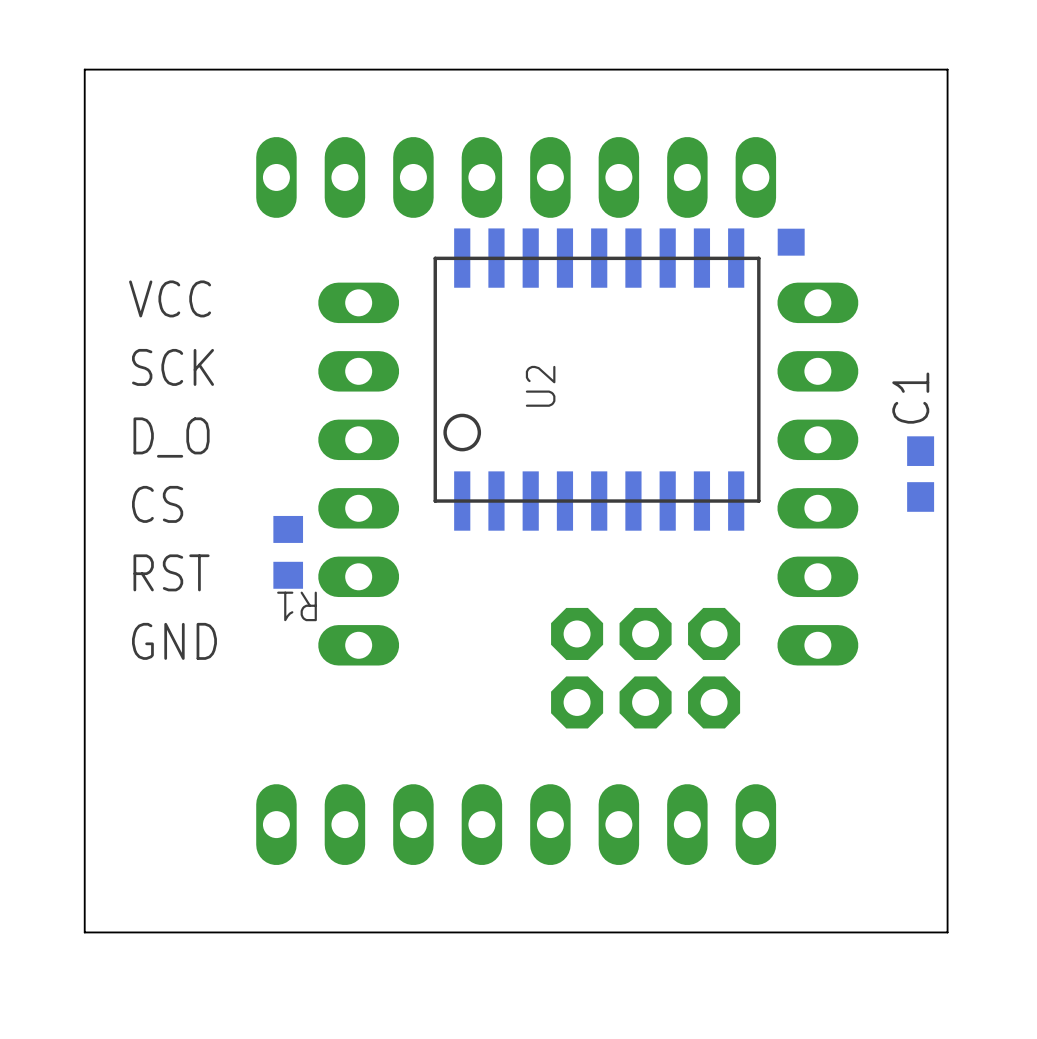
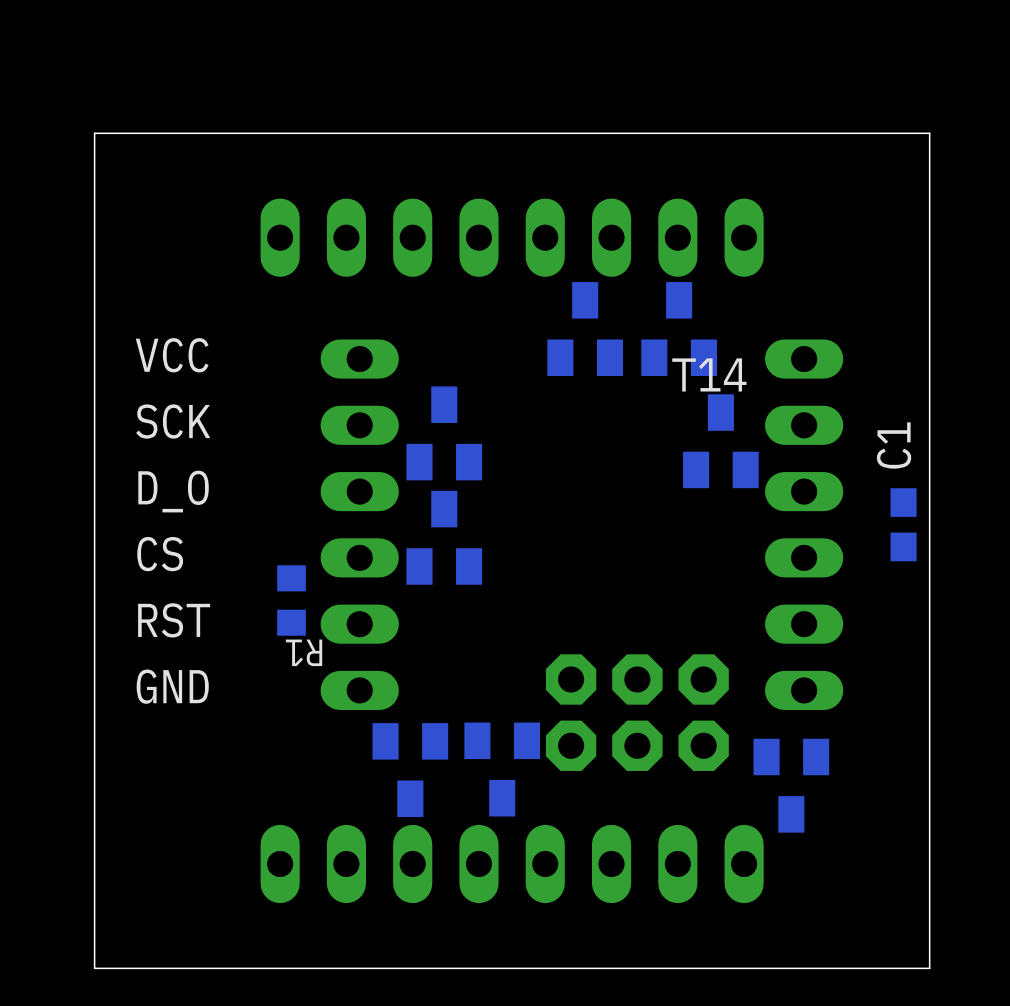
part: (791, 242) -> none
part: none -> (585, 329)
part: none -> (679, 329)
part: none -> (444, 433)
part: (597, 379) -> none
text: U2 (540, 386) -> none
T14: none -> (720, 441)
part: none -> (444, 537)
part: none -> (502, 769)
part: none -> (410, 770)
part: none -> (791, 785)

